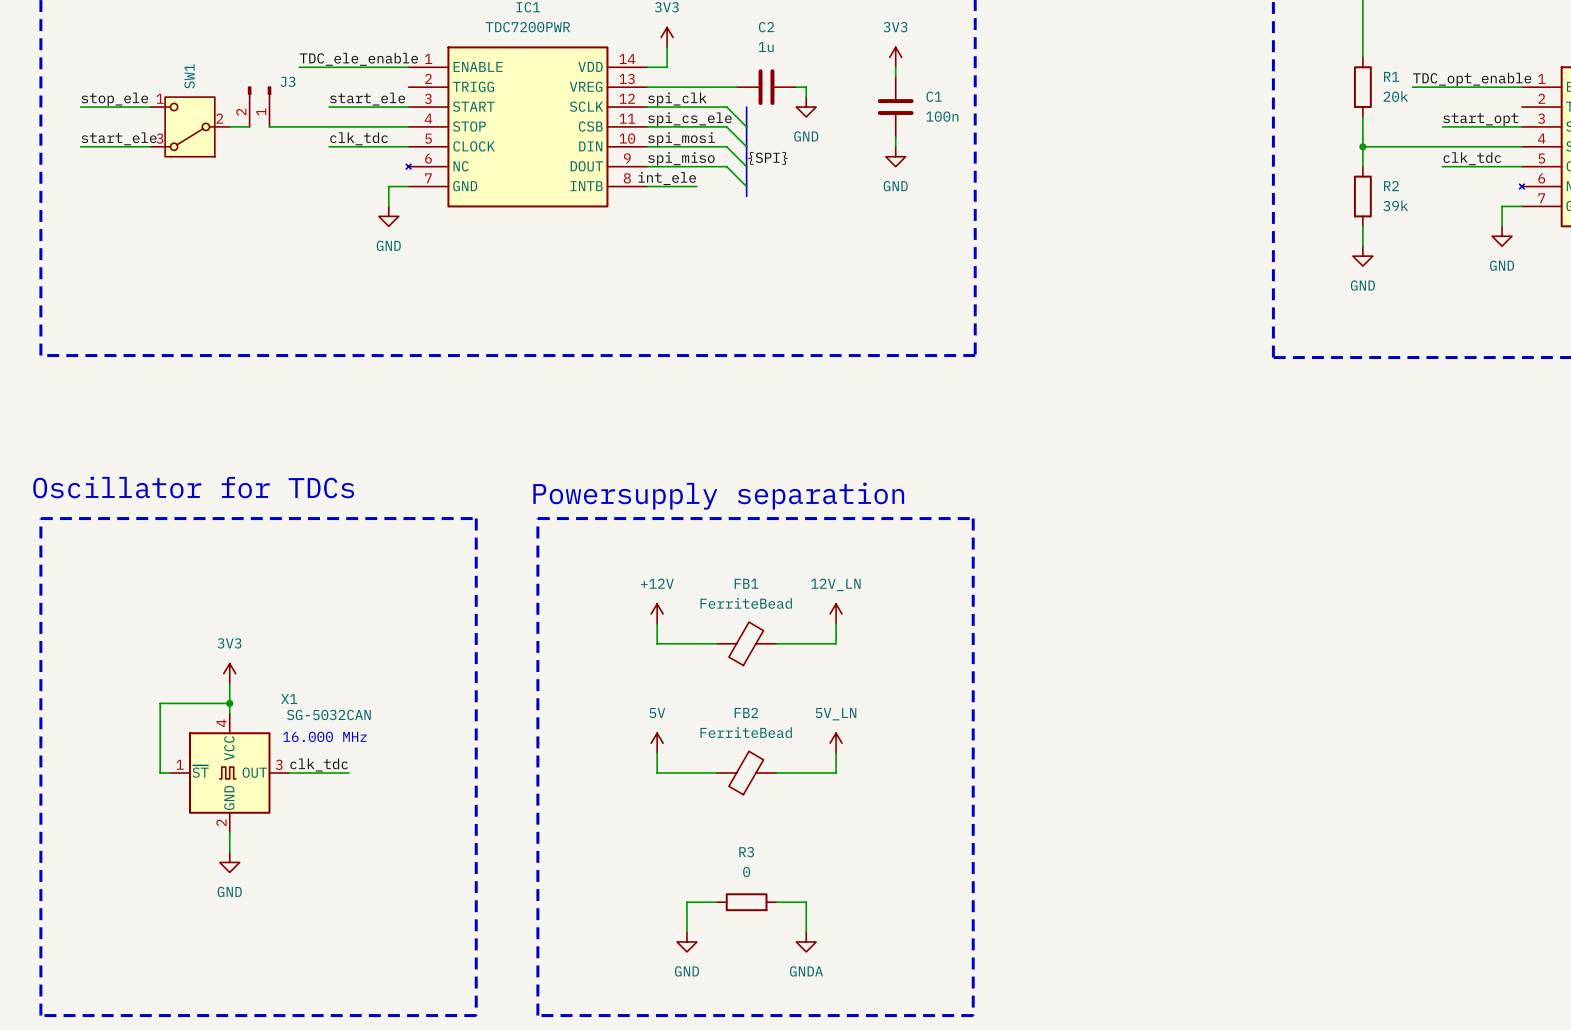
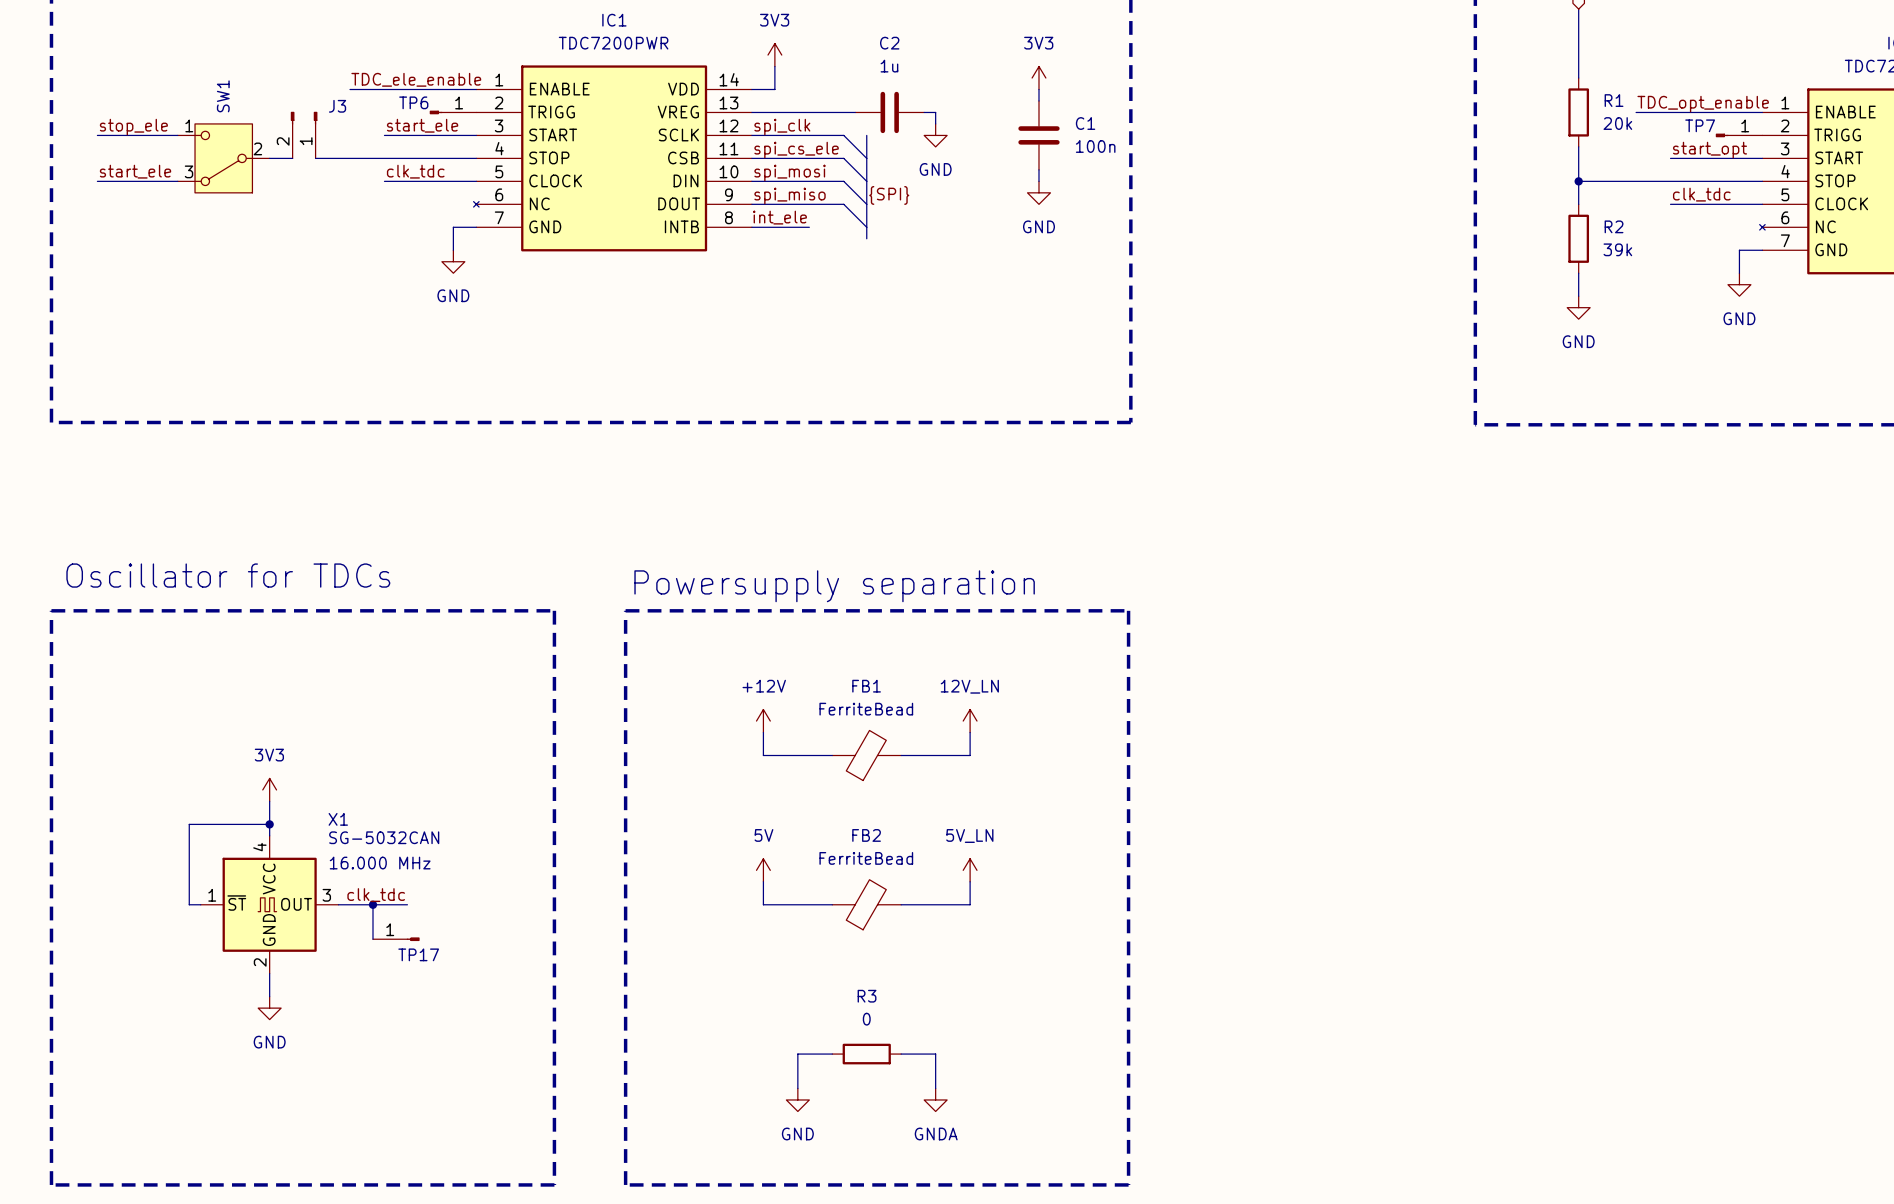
TP6: none -> (453, 112)
TP7: none -> (1739, 135)
wire: none -> (372, 904) (372, 939)
junction: none -> (372, 904)
TP17: none -> (396, 939)

